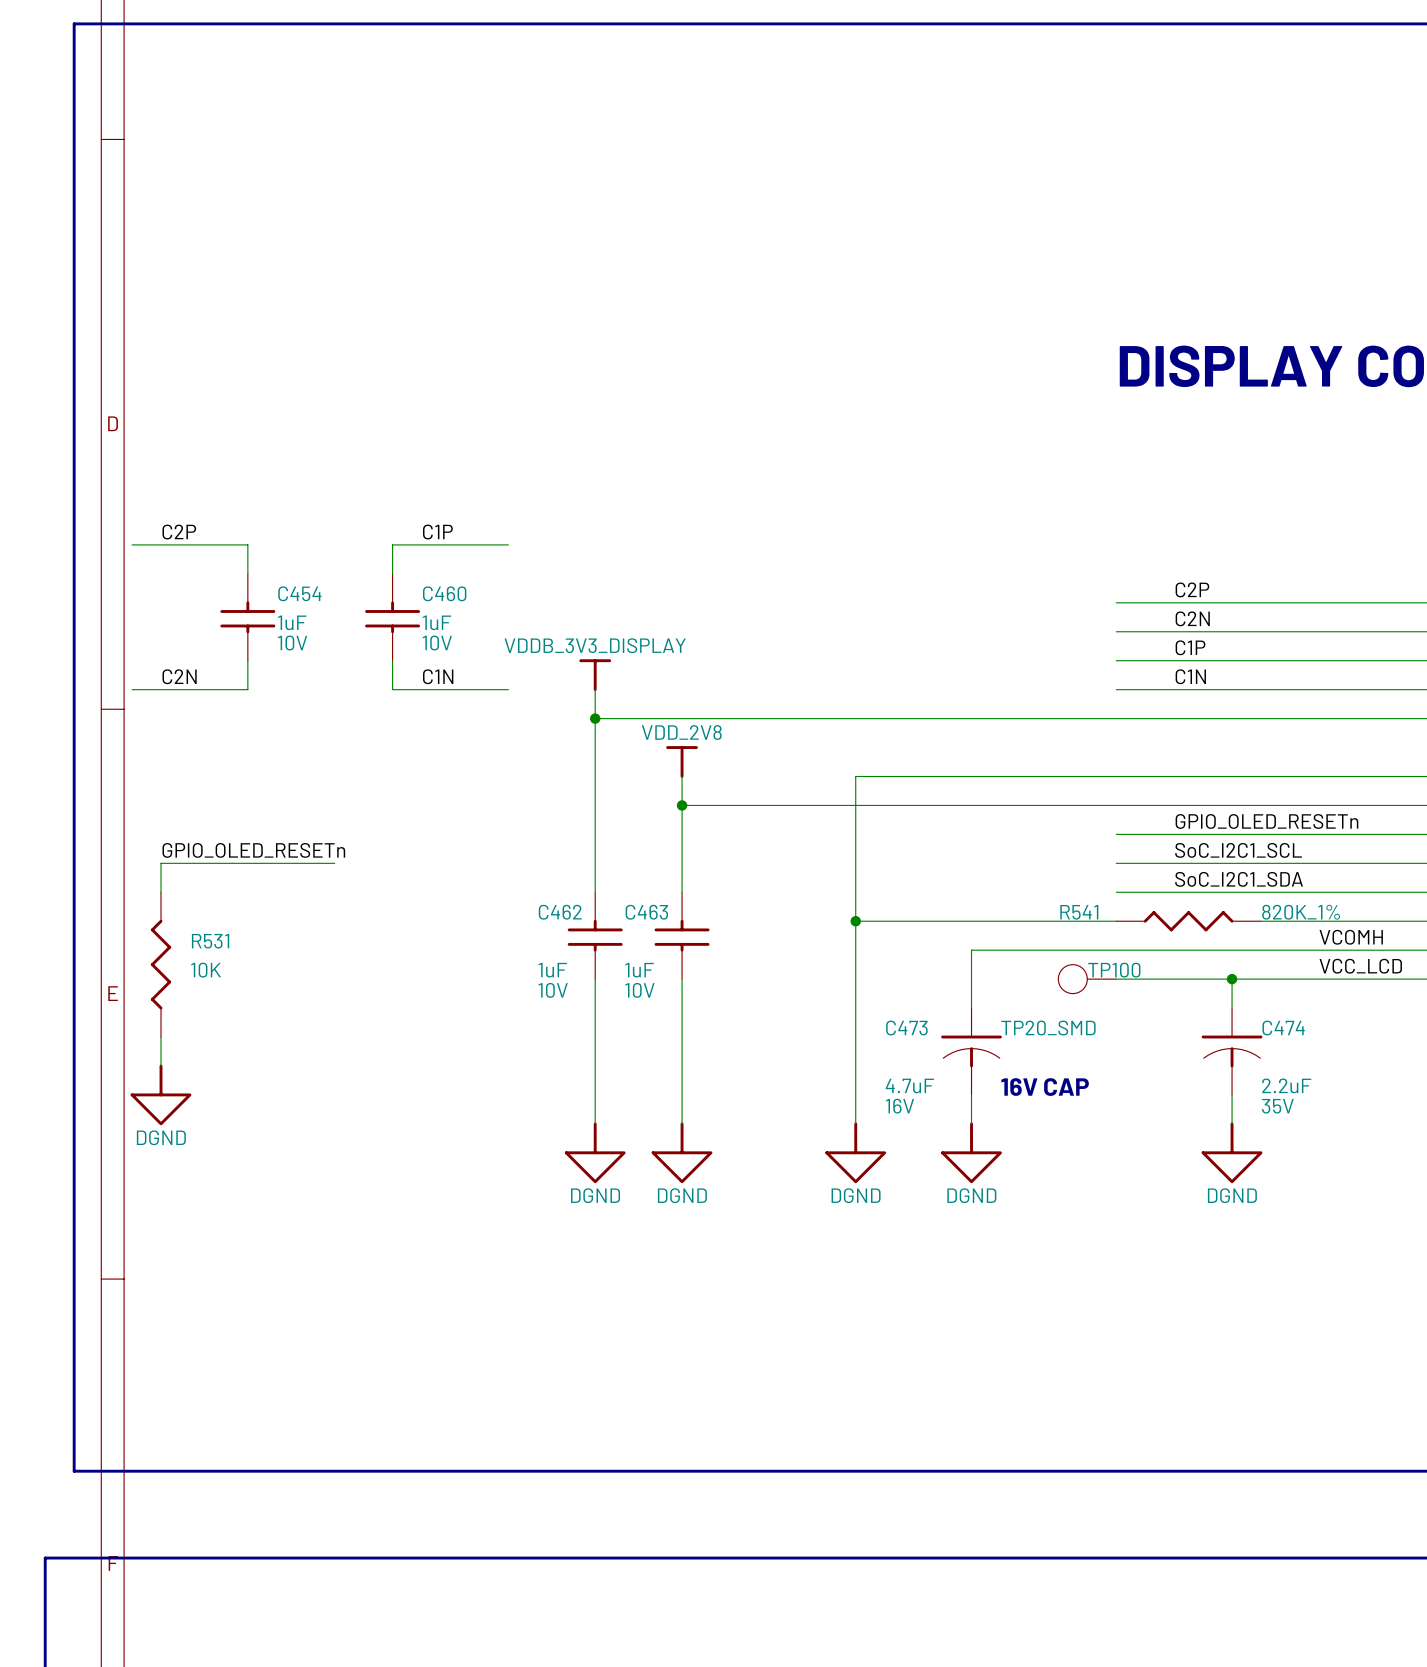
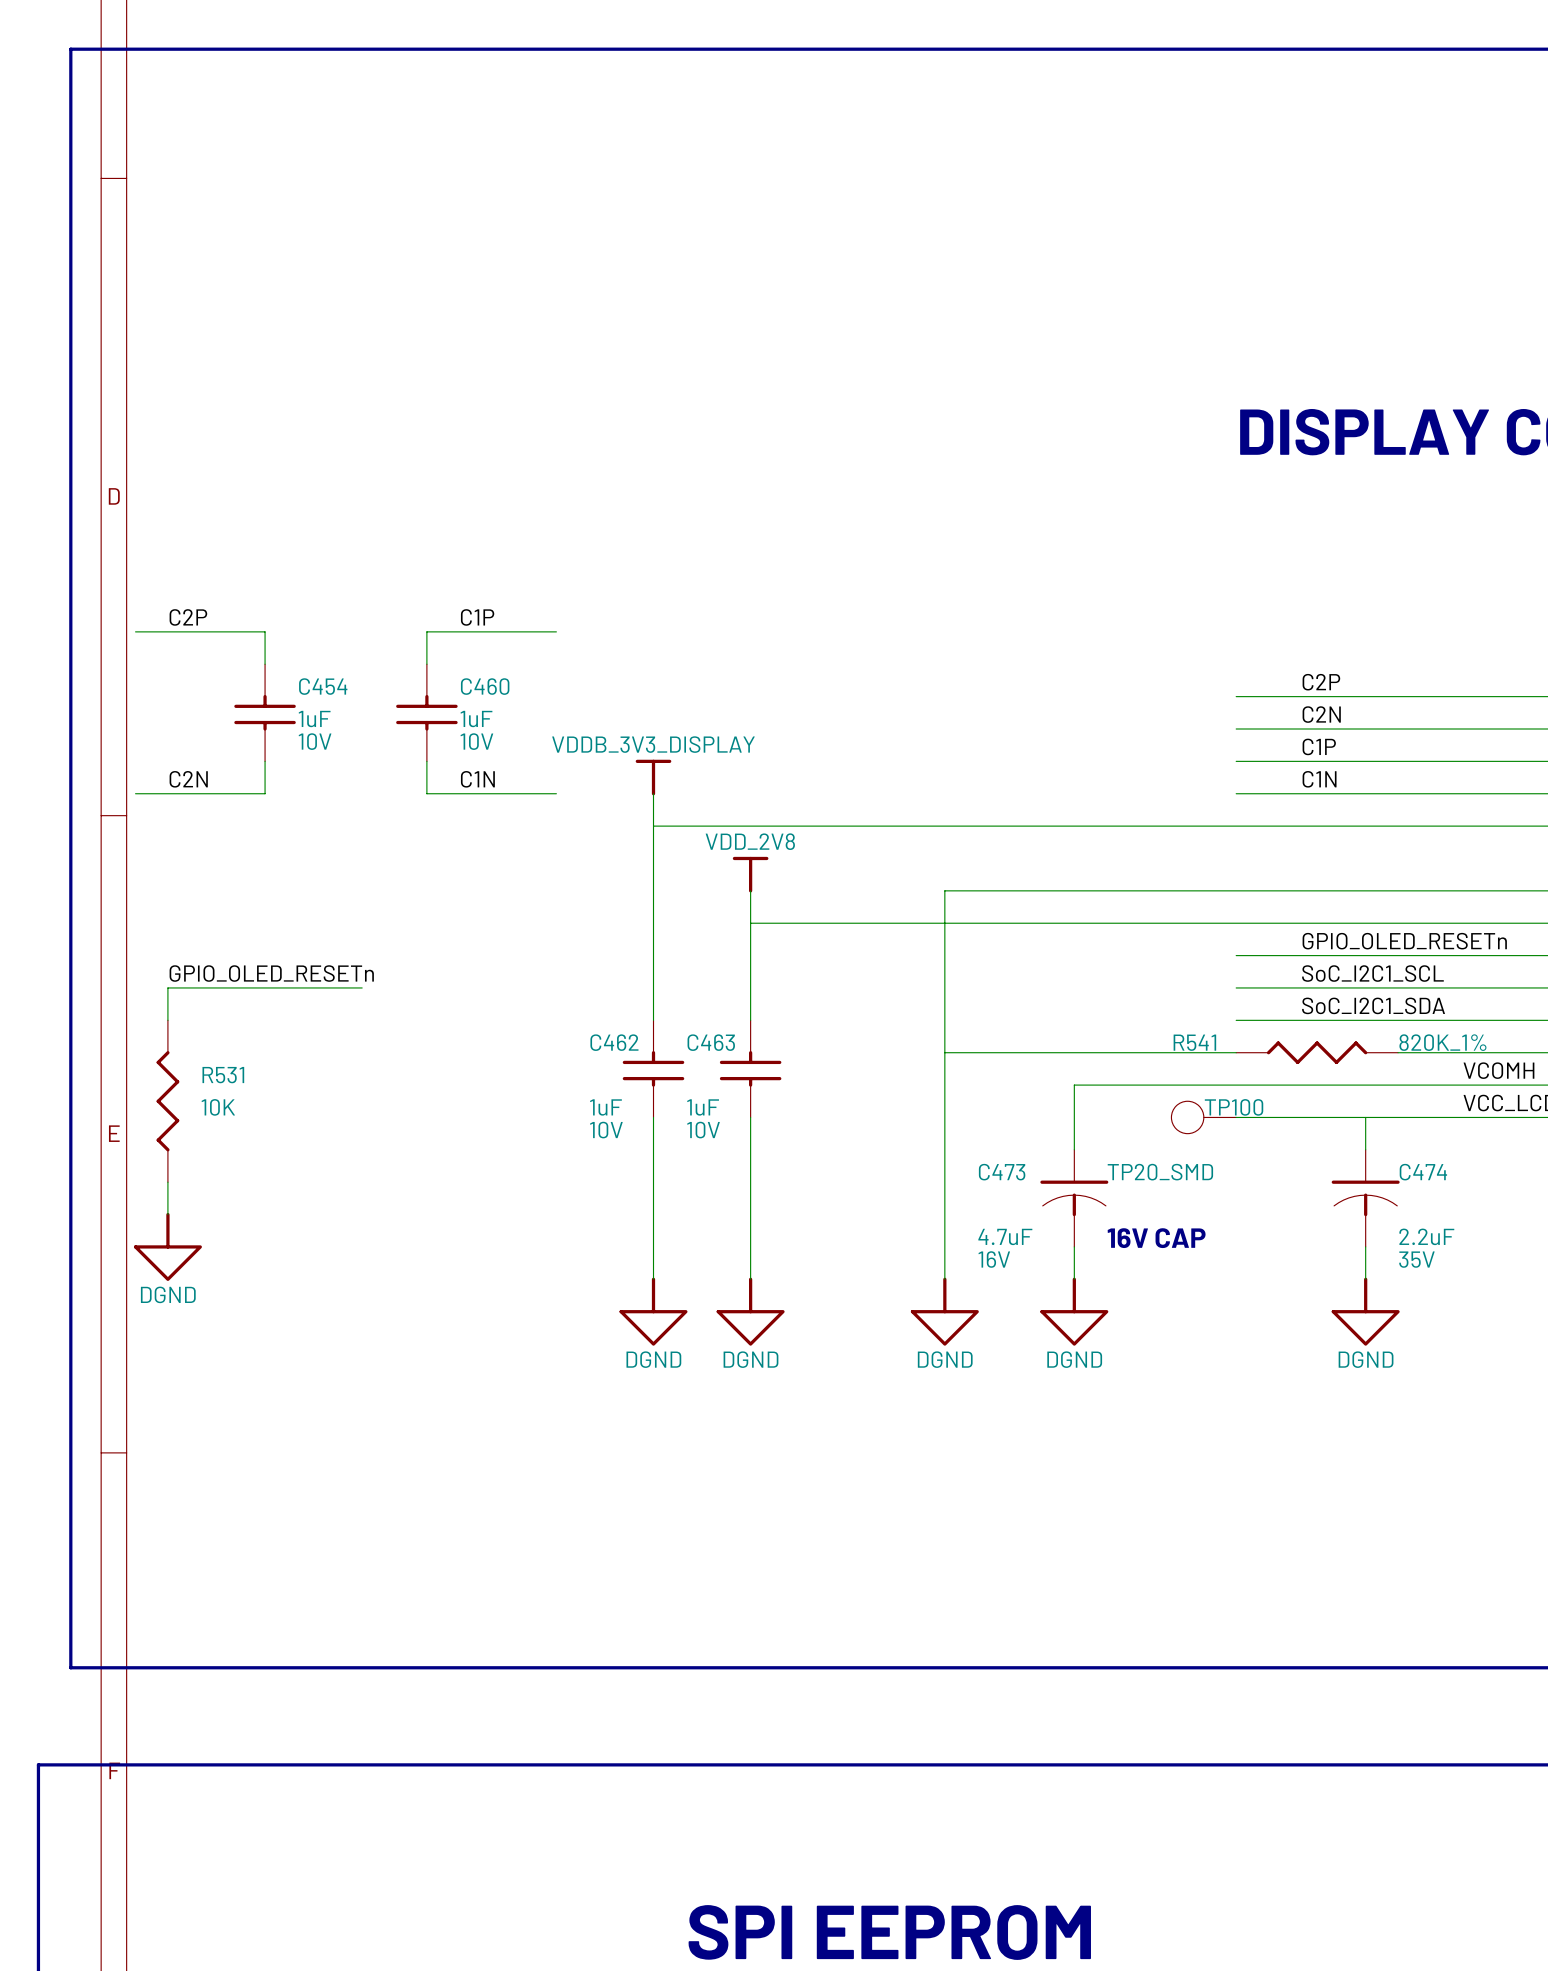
junction: (595, 718) -> none
junction: (682, 805) -> none
junction: (855, 921) -> none
junction: (1232, 979) -> none

